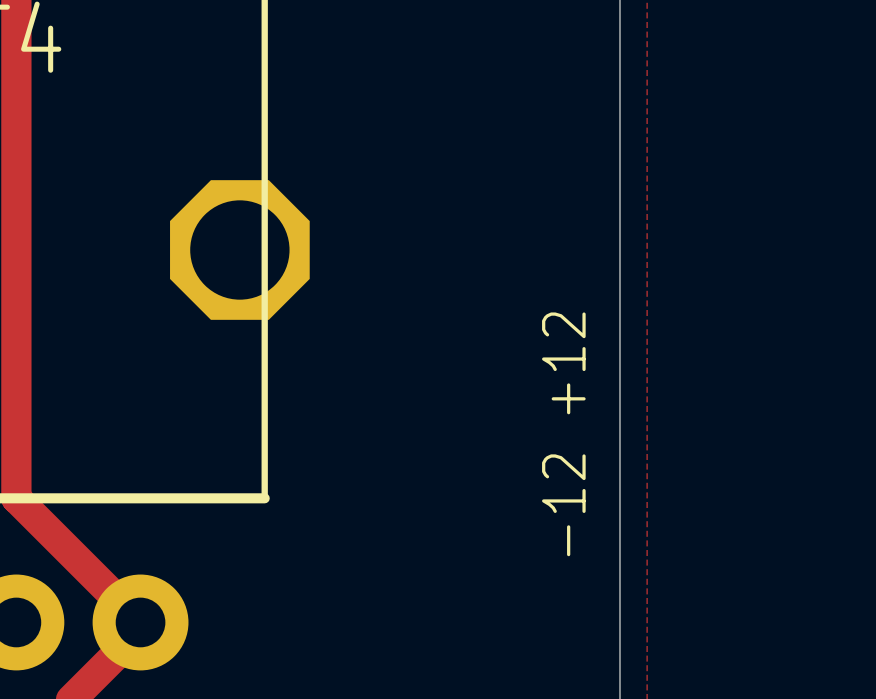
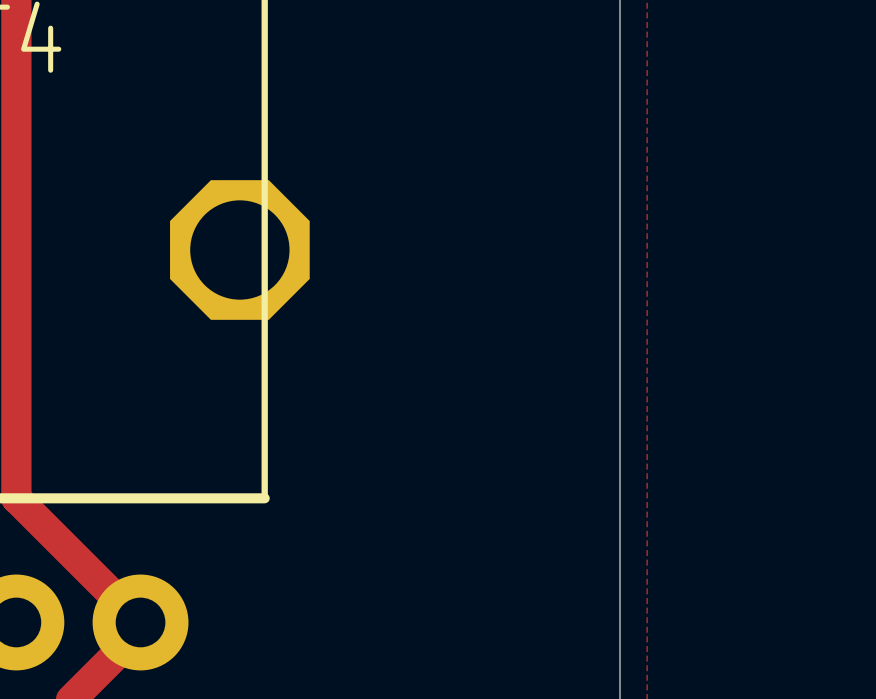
text: +12 (563, 363) -> none
text: -12 (563, 505) -> none

